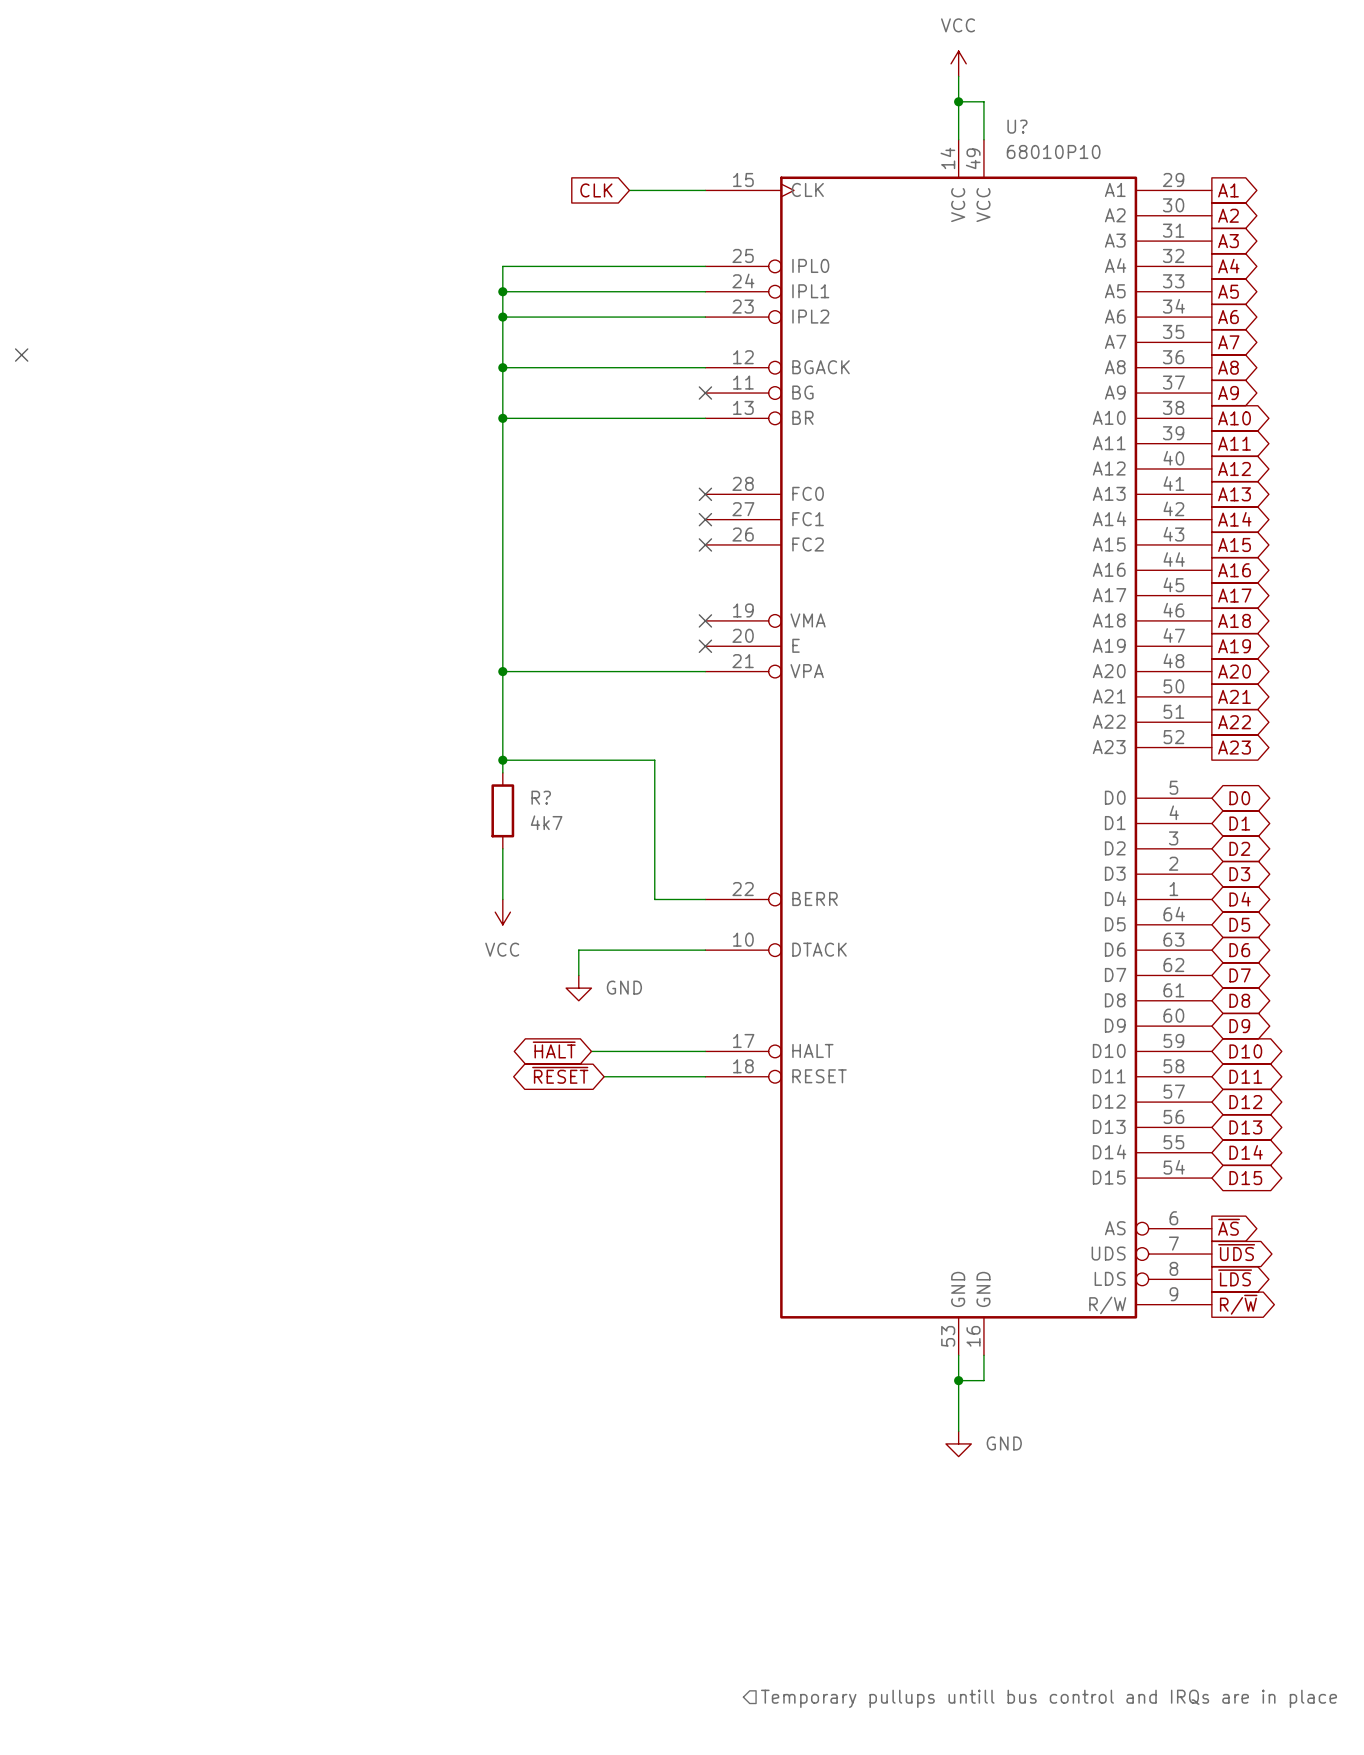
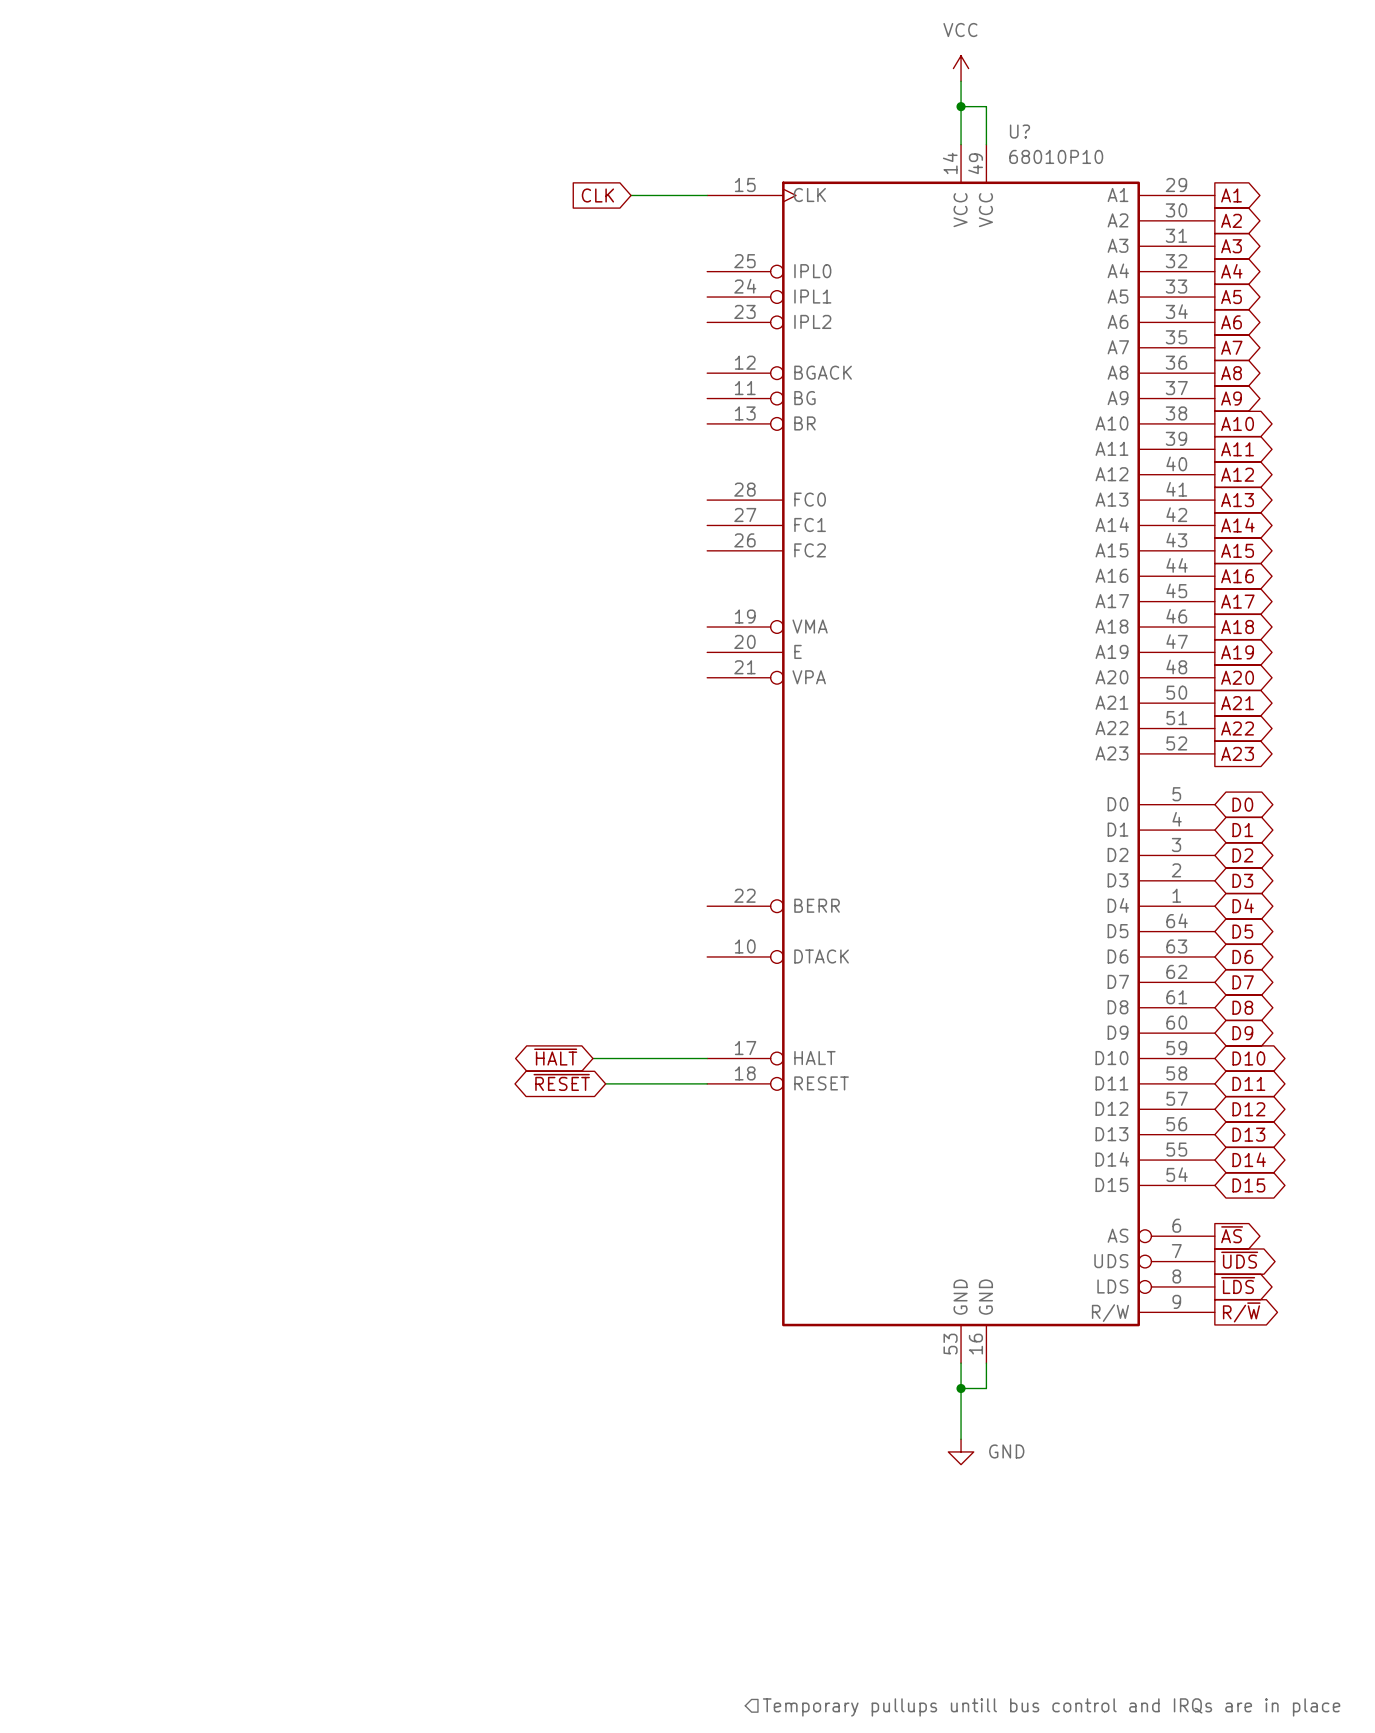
wire: (705, 266) (502, 266) (502, 772) -> none
wire: (502, 291) (705, 291) -> none
junction: (502, 291) -> none
wire: (502, 317) (705, 317) -> none
junction: (502, 317) -> none
no-connect mark: (21, 355) -> none
wire: (502, 367) (705, 367) -> none
junction: (502, 367) -> none
no-connect mark: (705, 393) -> none
wire: (502, 418) (705, 418) -> none
junction: (502, 418) -> none
no-connect mark: (705, 494) -> none
no-connect mark: (705, 519) -> none
no-connect mark: (705, 544) -> none
no-connect mark: (705, 620) -> none
no-connect mark: (705, 646) -> none
wire: (502, 671) (705, 671) -> none
junction: (502, 671) -> none
wire: (502, 760) (654, 760) (654, 899) (705, 899) -> none
junction: (502, 760) -> none
R?: 4k7 (502, 810) -> none
wire: (502, 848) (502, 899) -> none
power symbol: VCC (502, 912) -> none
wire: (705, 950) (578, 950) (578, 975) -> none
power symbol: GND (578, 988) -> none

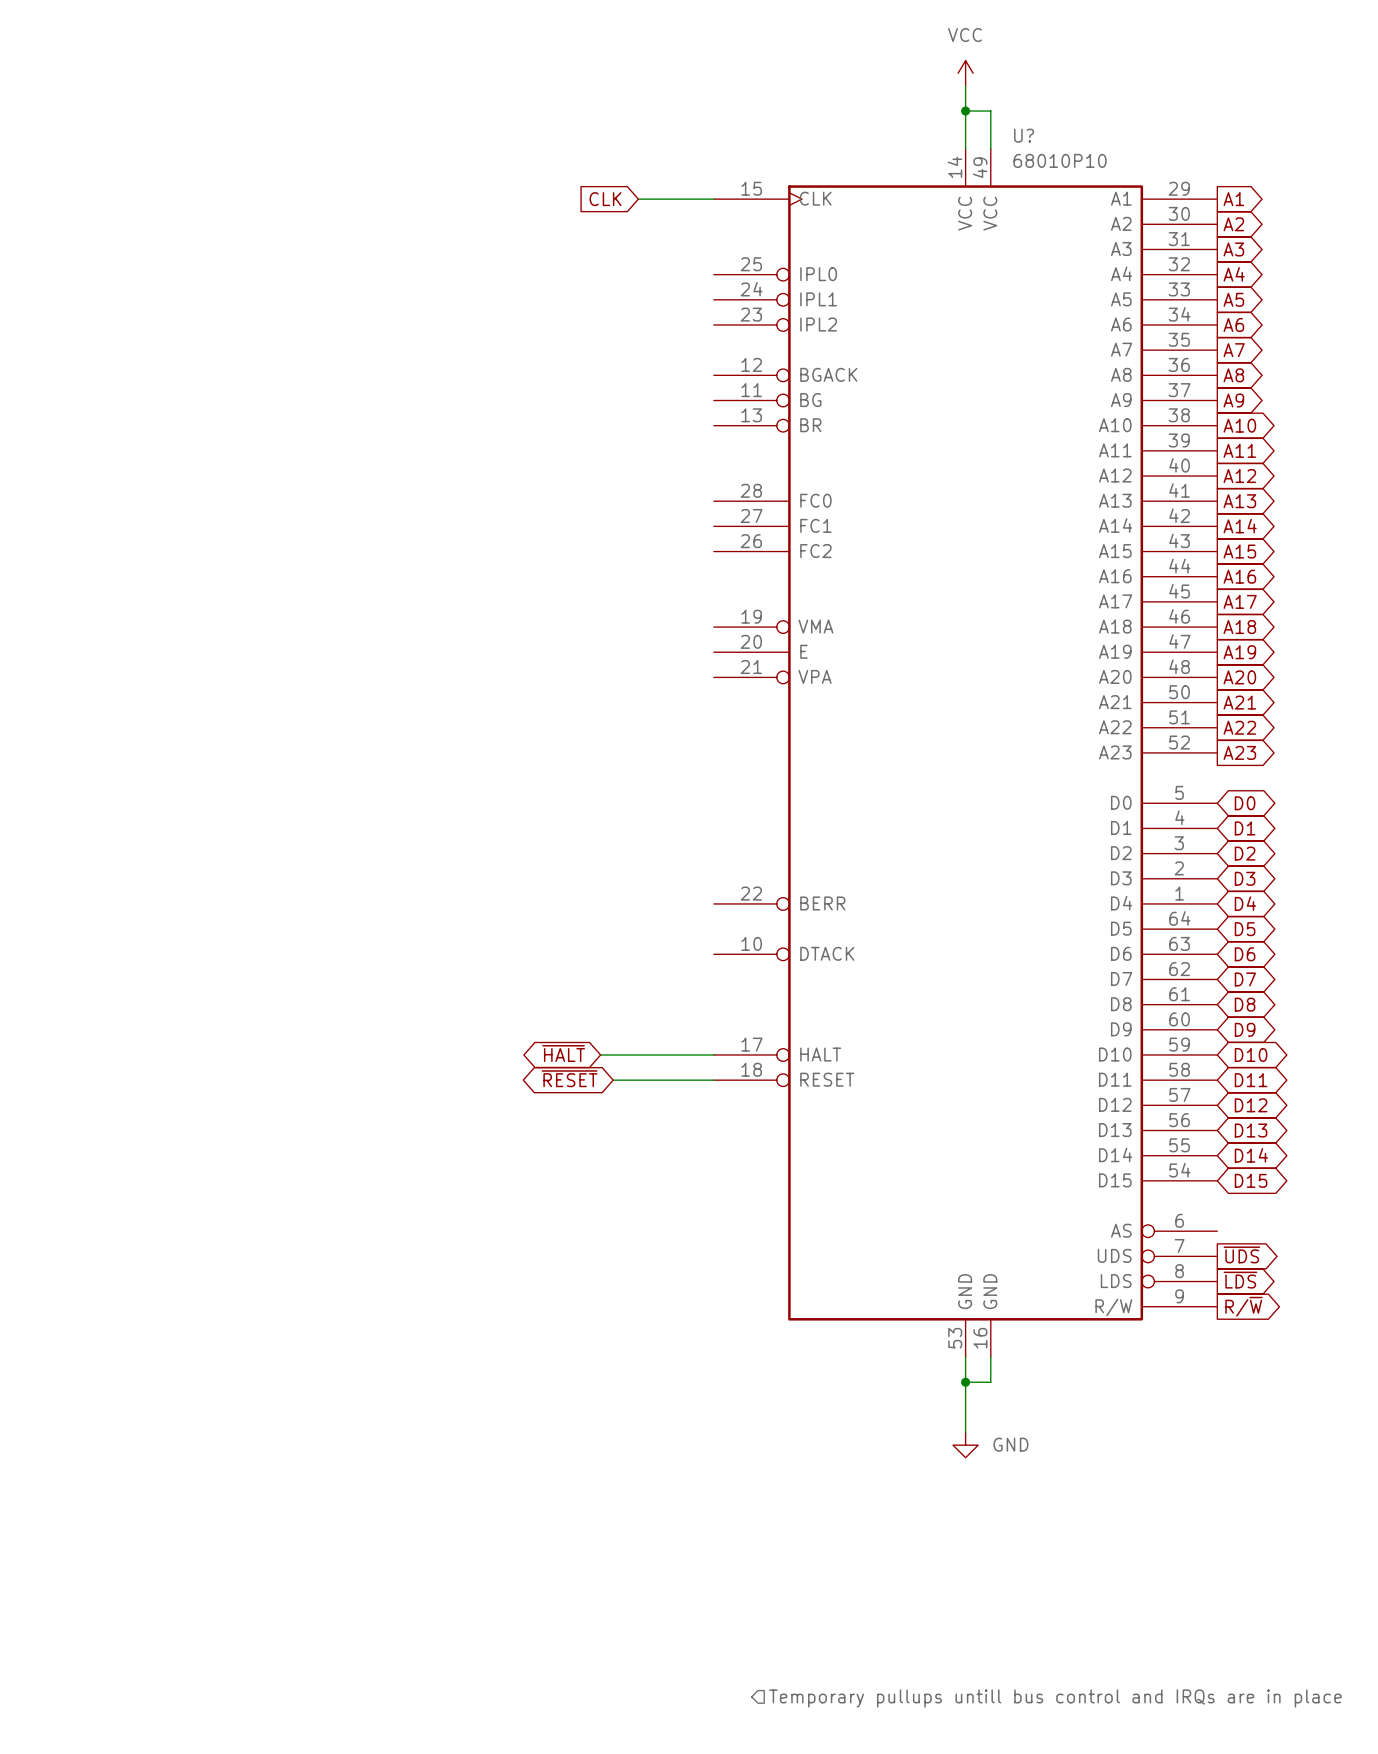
global label: ~{AS} (1232, 1234) -> none

